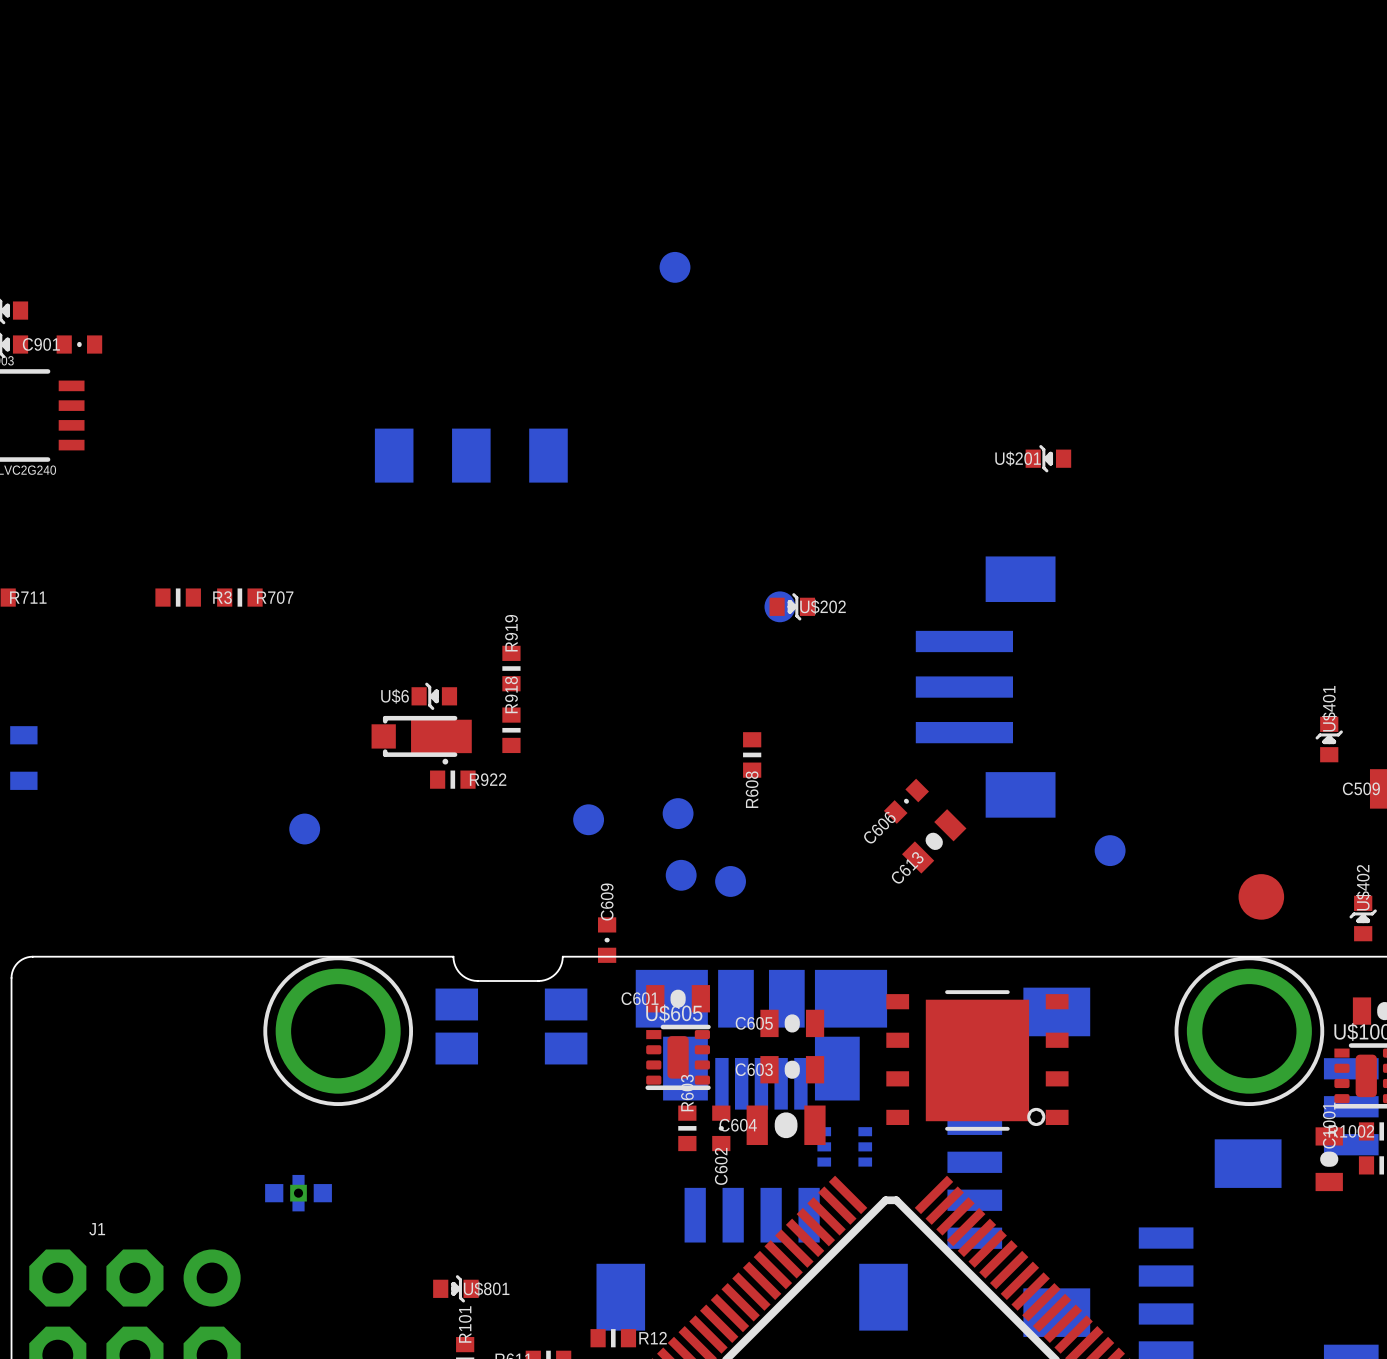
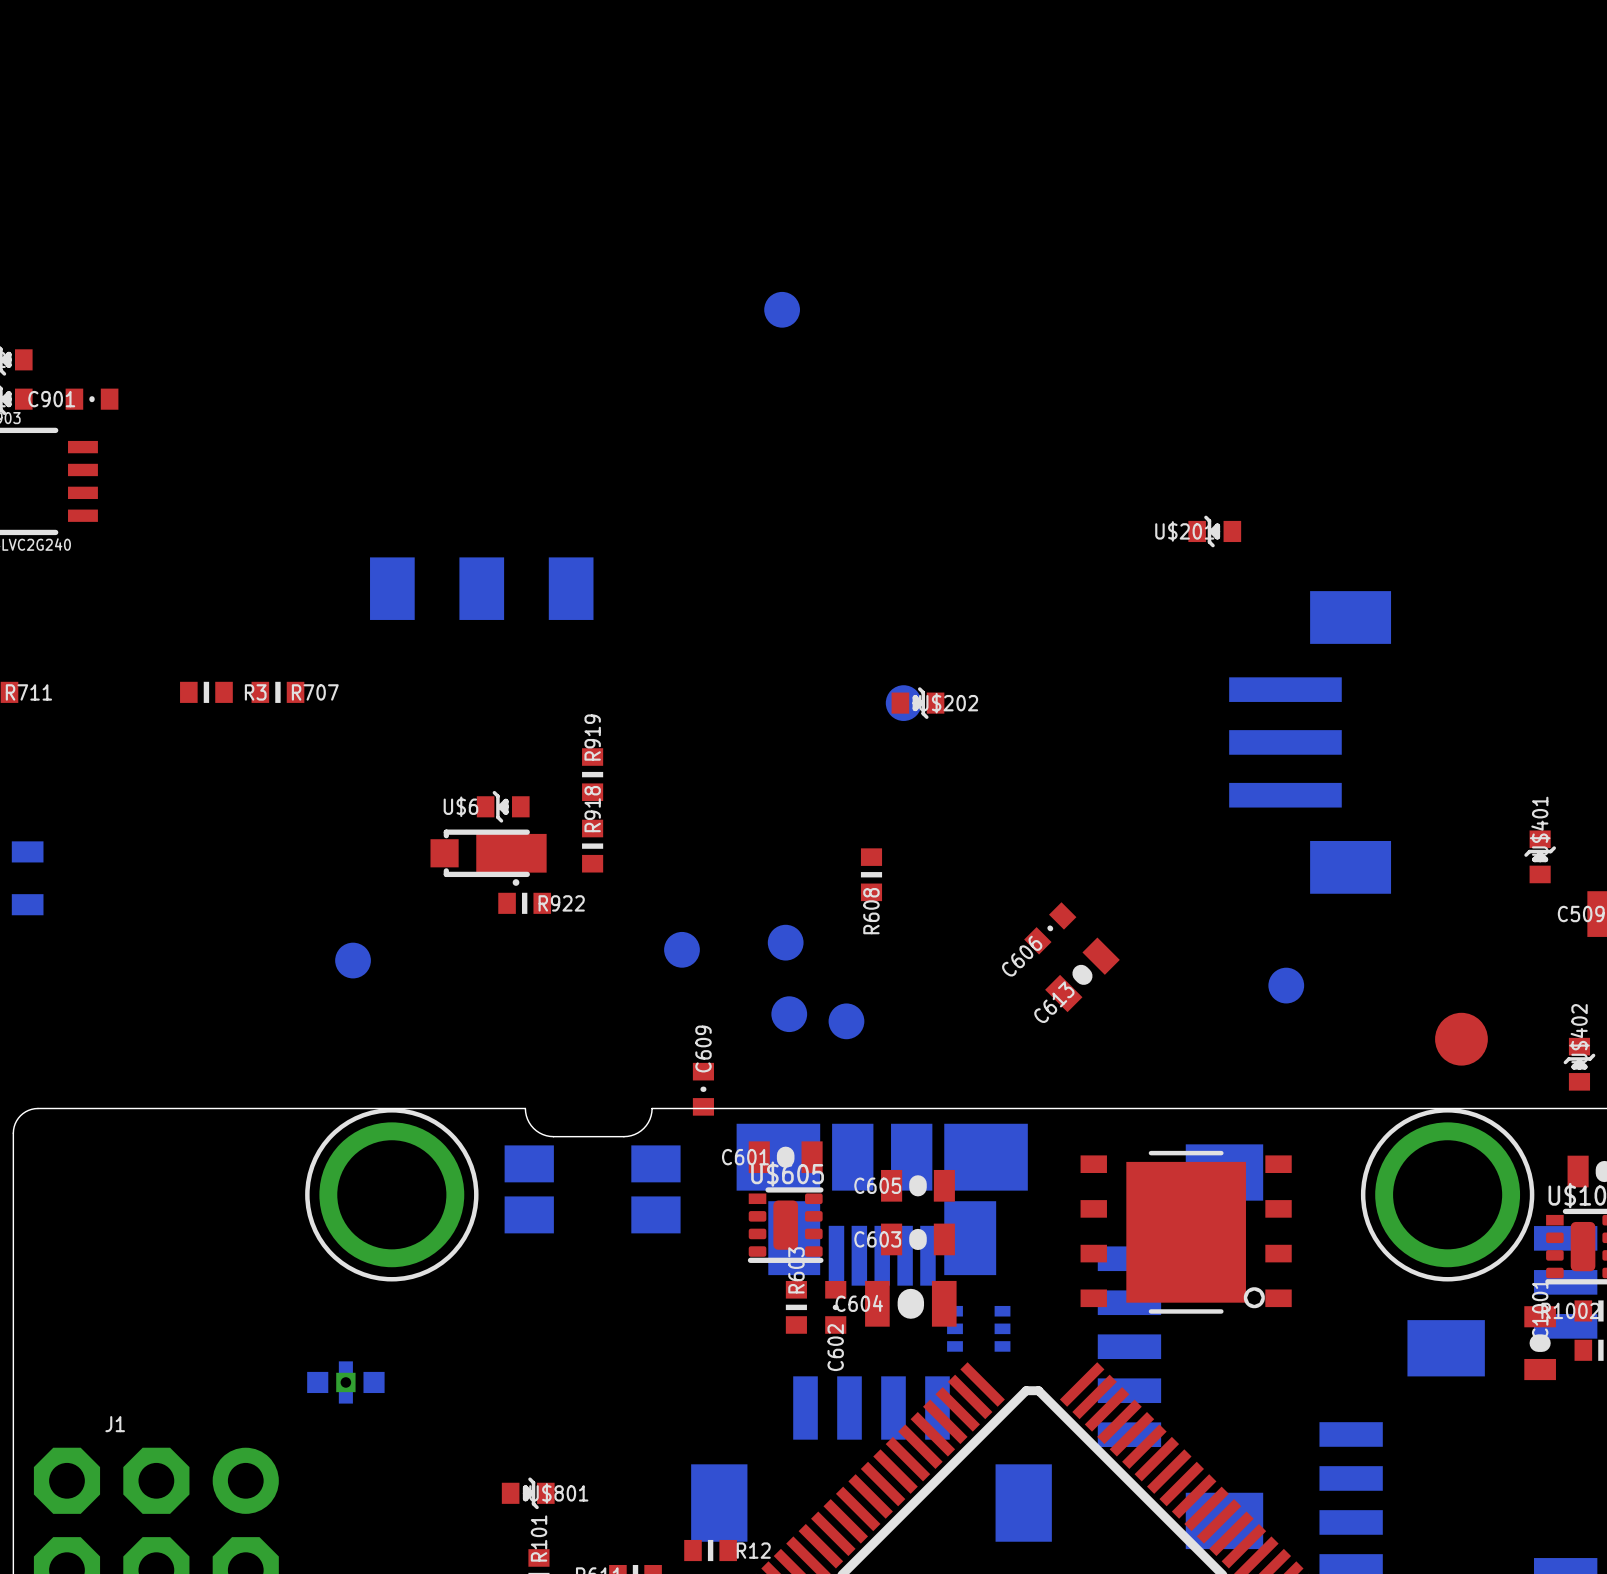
part position: (471, 455) -> (481, 588)
part position: (985, 687) -> (1310, 742)
part position: (977, 1060) -> (1186, 1232)

